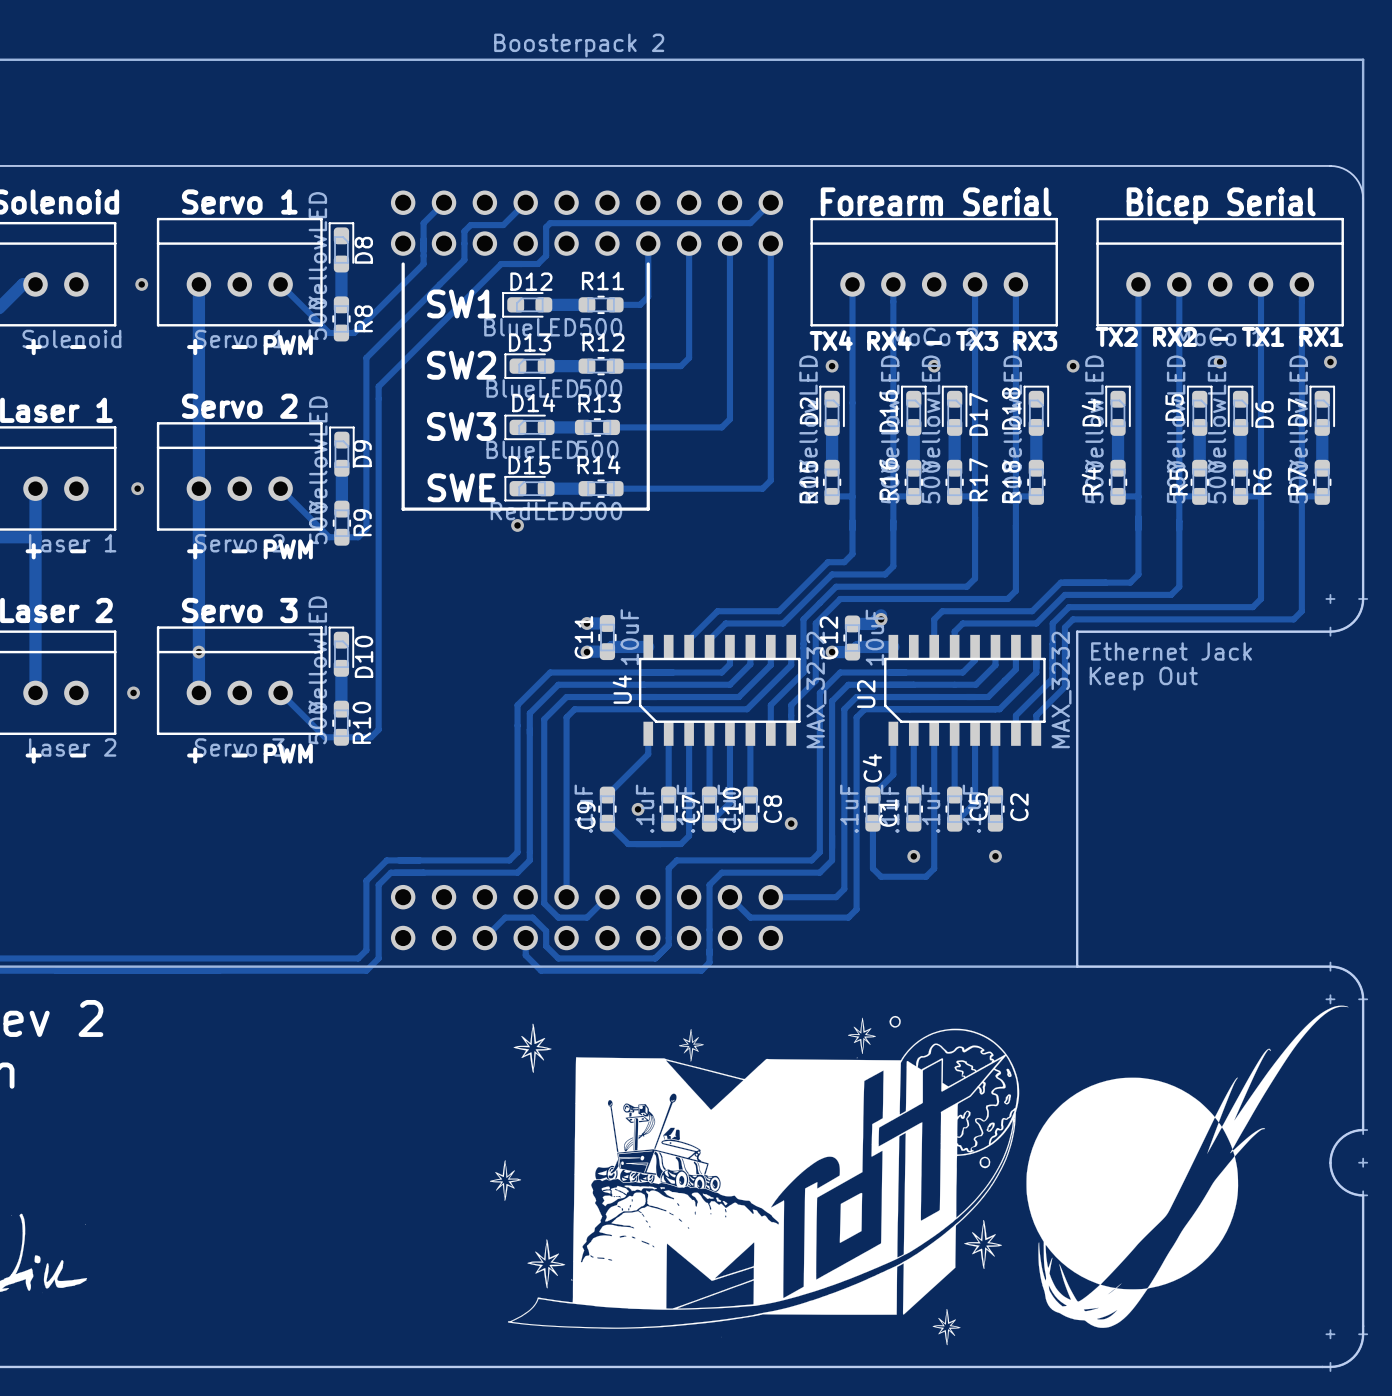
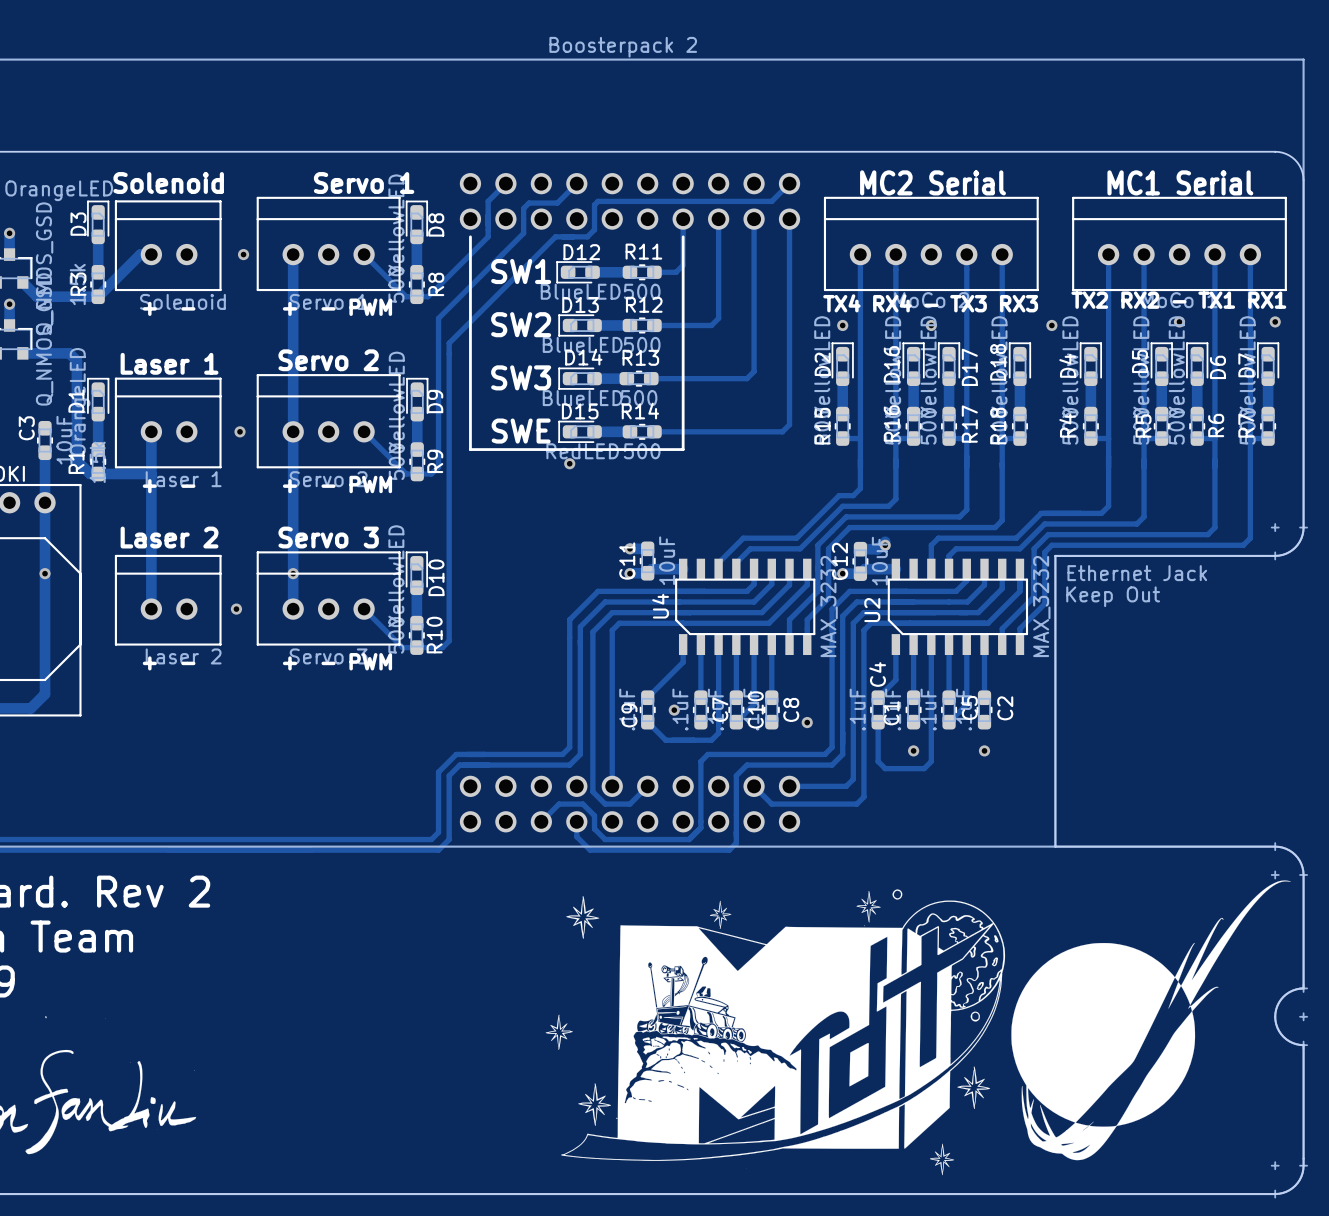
text position: Servo 1 (239, 201) -> Servo 1 (364, 183)
text: Forearm Serial (936, 201) -> MC2 Serial (933, 182)
text: Bicep Serial (1221, 205) -> MC1 Serial (1180, 182)

